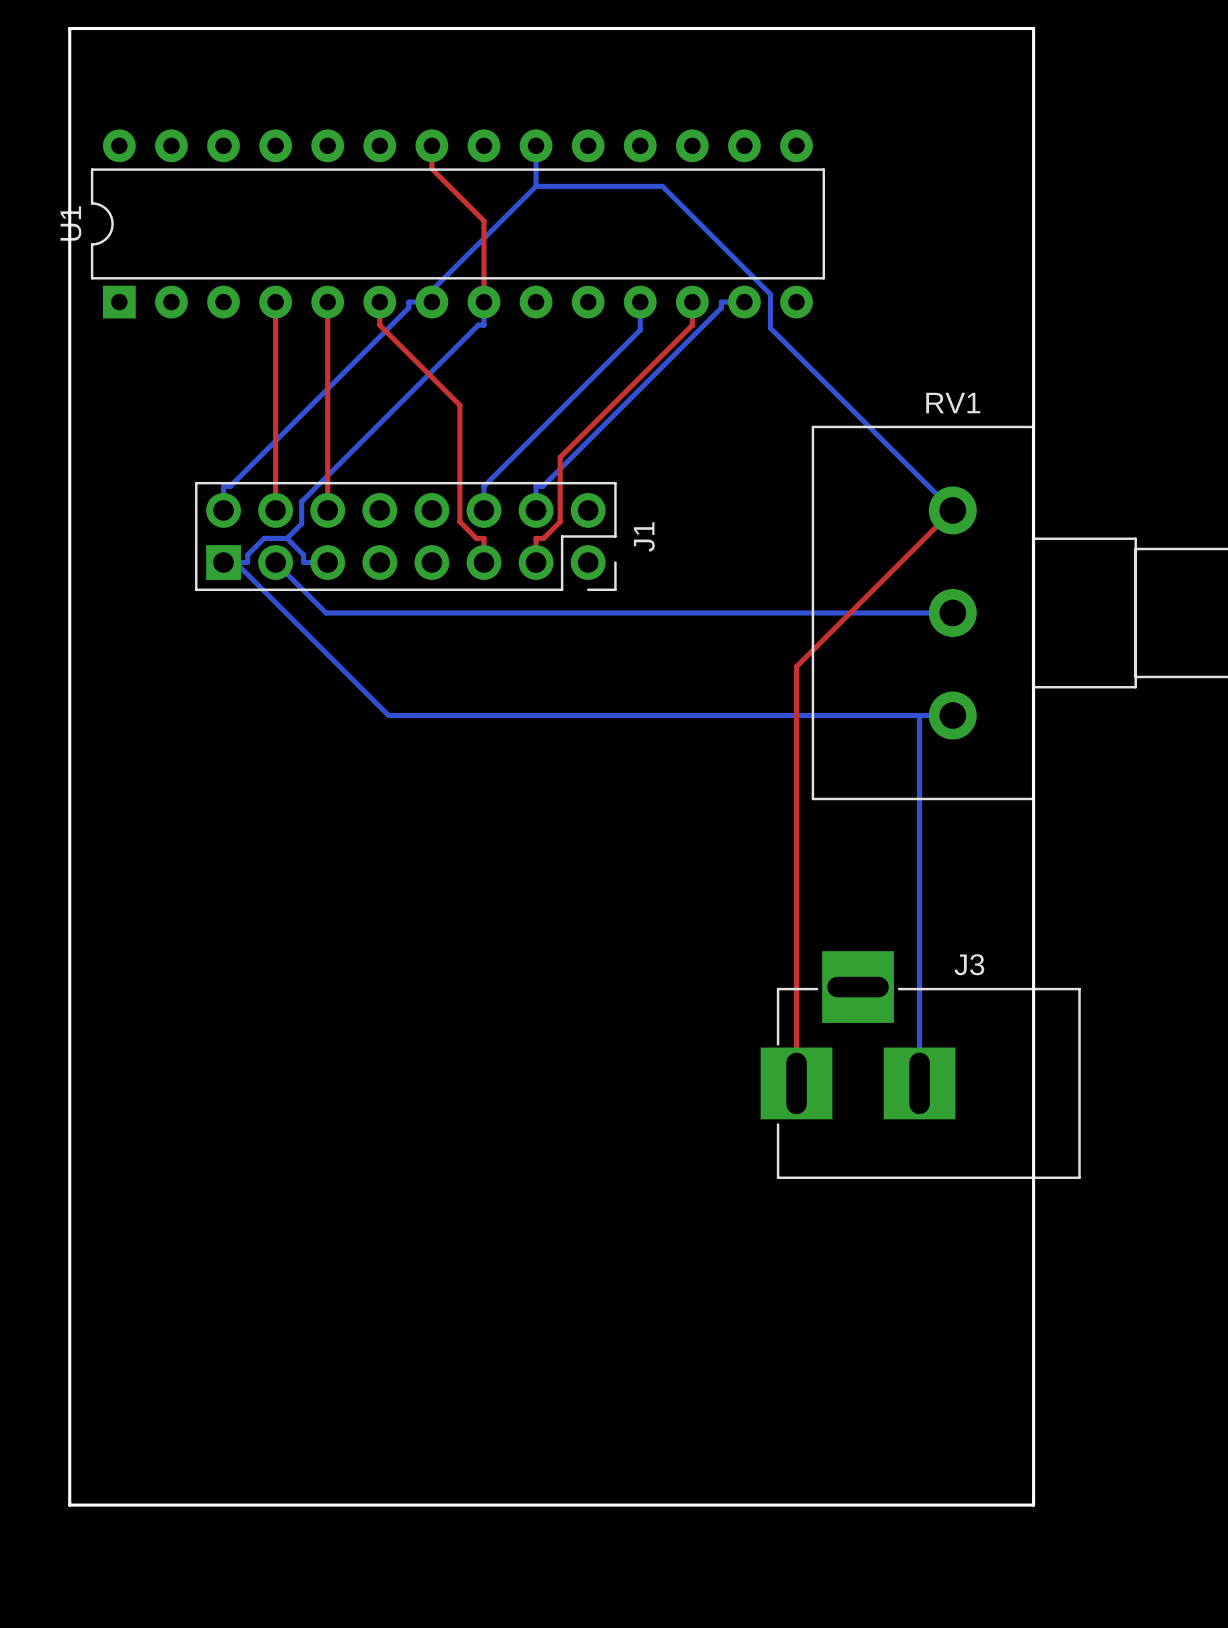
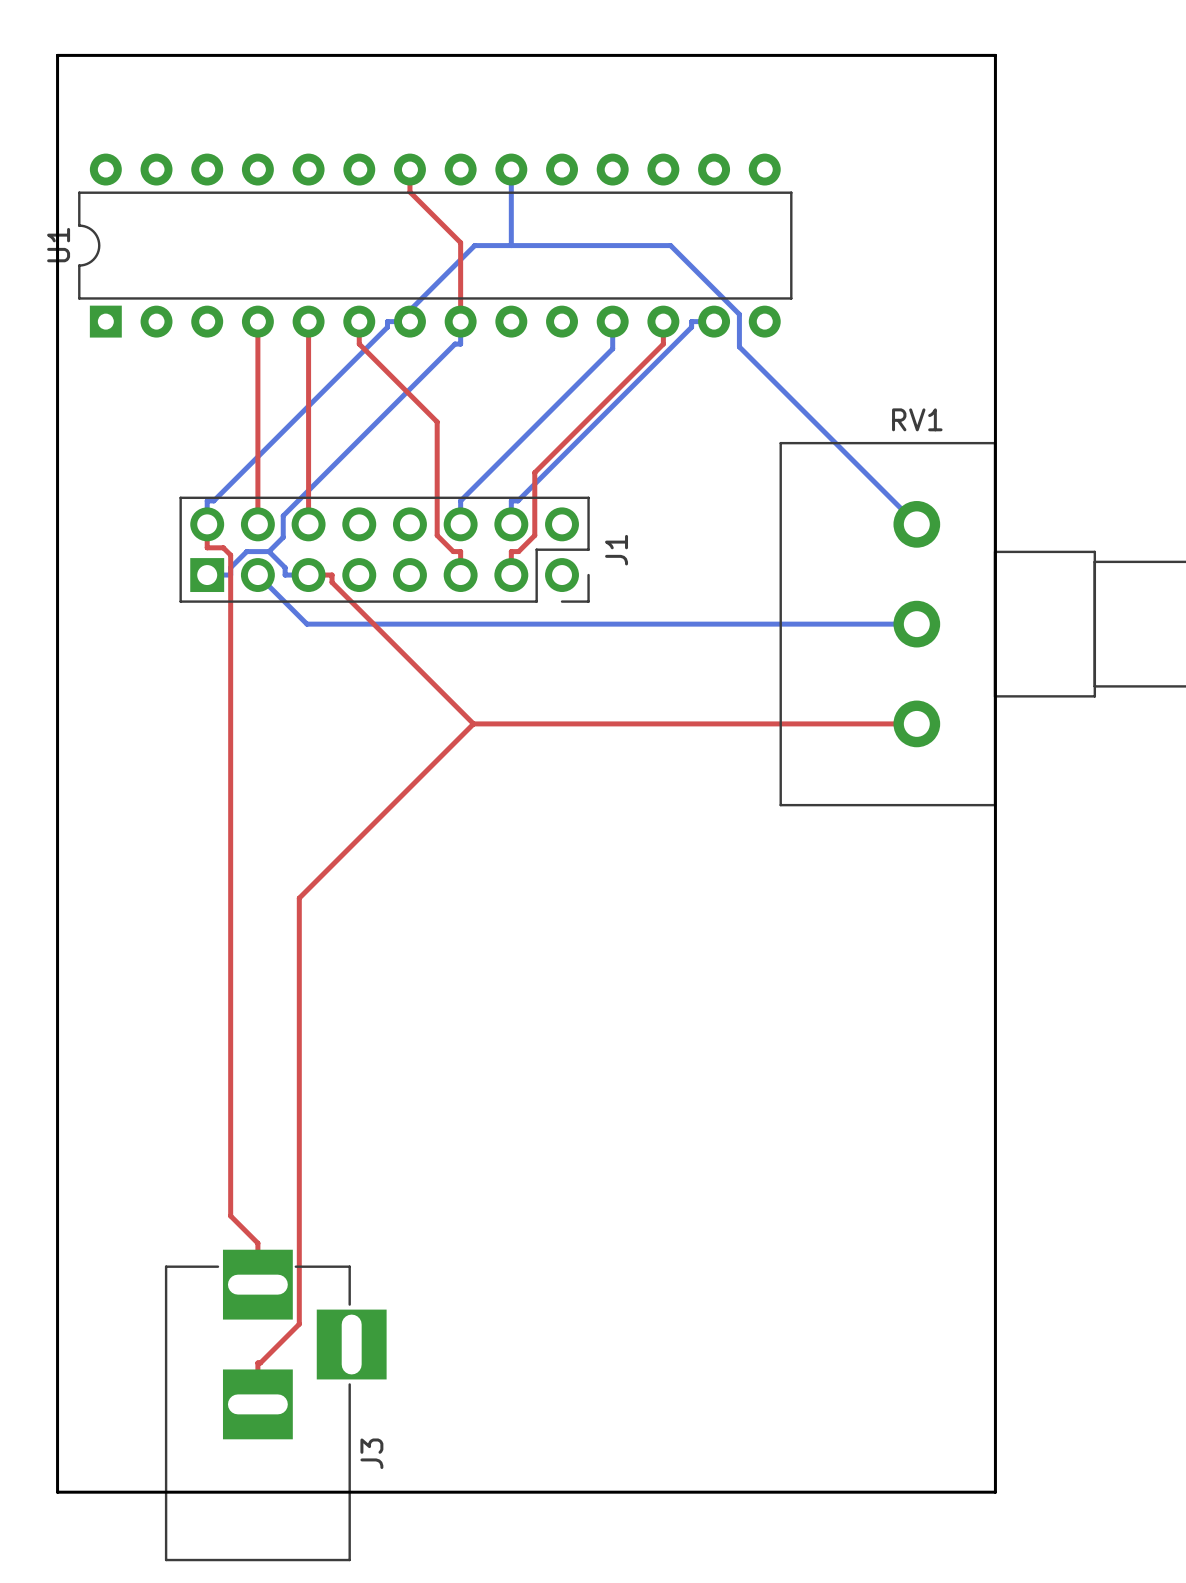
bottom track: none -> (511, 209) (511, 245)
bottom track: (498, 223) (536, 186) (662, 186) (770, 294) -> (474, 245) (670, 245) (739, 314)
top track: none -> (207, 524) (207, 547) (223, 547) (230, 555) (230, 1216) (257, 1243) (257, 1284)
top track: (952, 510) (796, 666) (796, 1083) -> none
bottom track: (235, 562) (388, 715) (952, 715) -> none
top track: none -> (308, 575) (332, 575) (332, 582) (473, 723)
top track: none -> (473, 723) (299, 898) (299, 1324) (260, 1362) (257, 1362) (257, 1404)
top track: none -> (473, 723) (916, 723)
bottom track: (919, 715) (919, 1083) -> none
J3 rotation: 0° (920, 1065) -> 90° clockwise (275, 1405)
J3 position: (920, 1065) -> (275, 1405)

